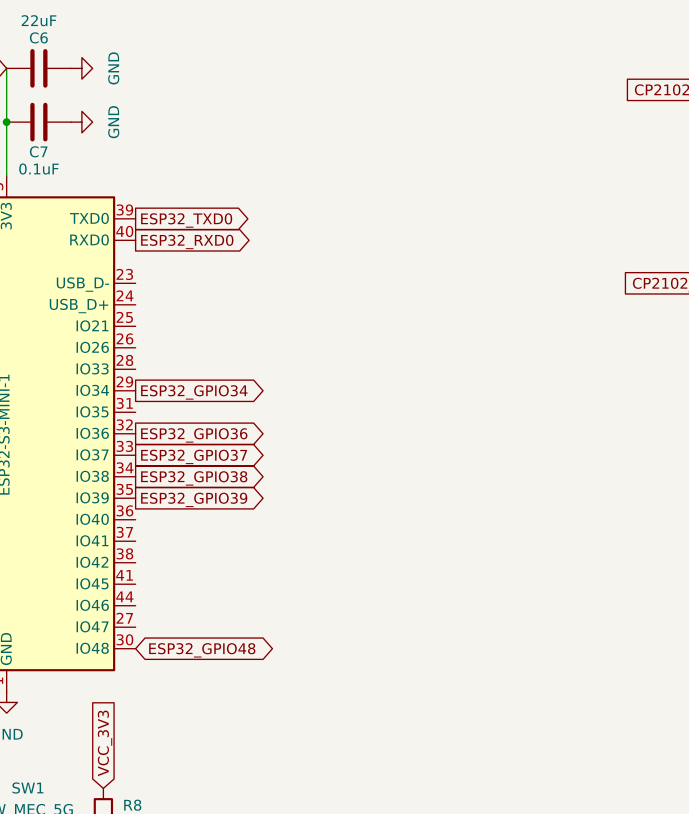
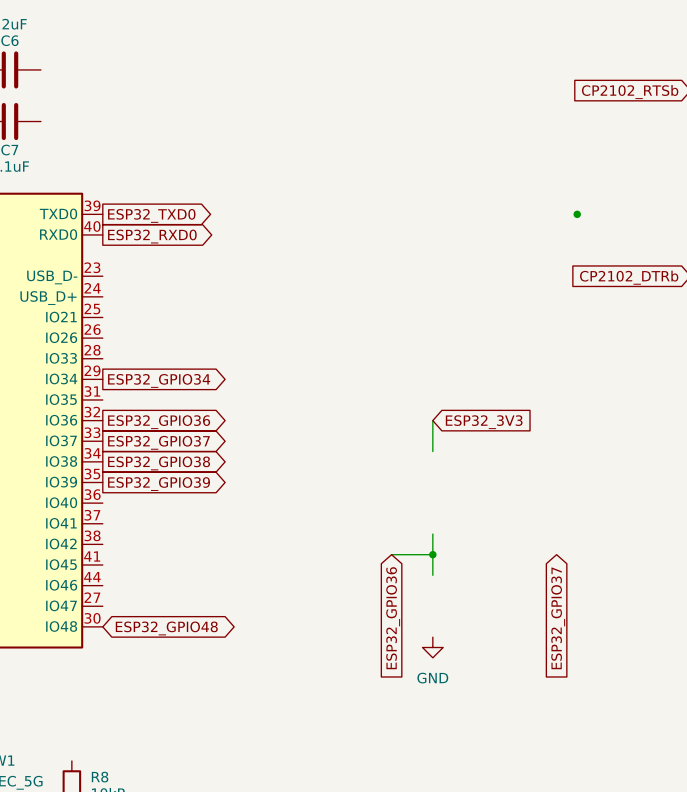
power symbol: GND (81, 68) -> none
power symbol: GND (81, 122) -> none
junction: none -> (577, 214)
wire: none -> (432, 420) (432, 451)
global label: none -> ESP32_3V3 (484, 422)
wire: none -> (432, 534) (432, 575)
wire: none -> (391, 554) (432, 554)
junction: none -> (432, 554)
global label: none -> ESP32_GPIO36 (393, 618)
global label: none -> ESP32_GPIO37 (558, 618)
power symbol: none -> GND (432, 647)
global label: VCC_3V3 (105, 743) -> none

